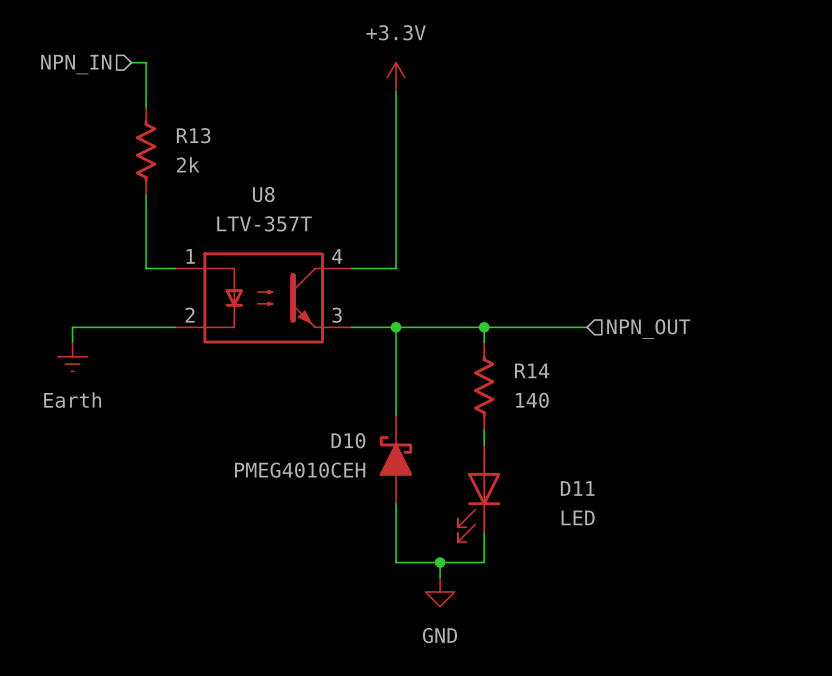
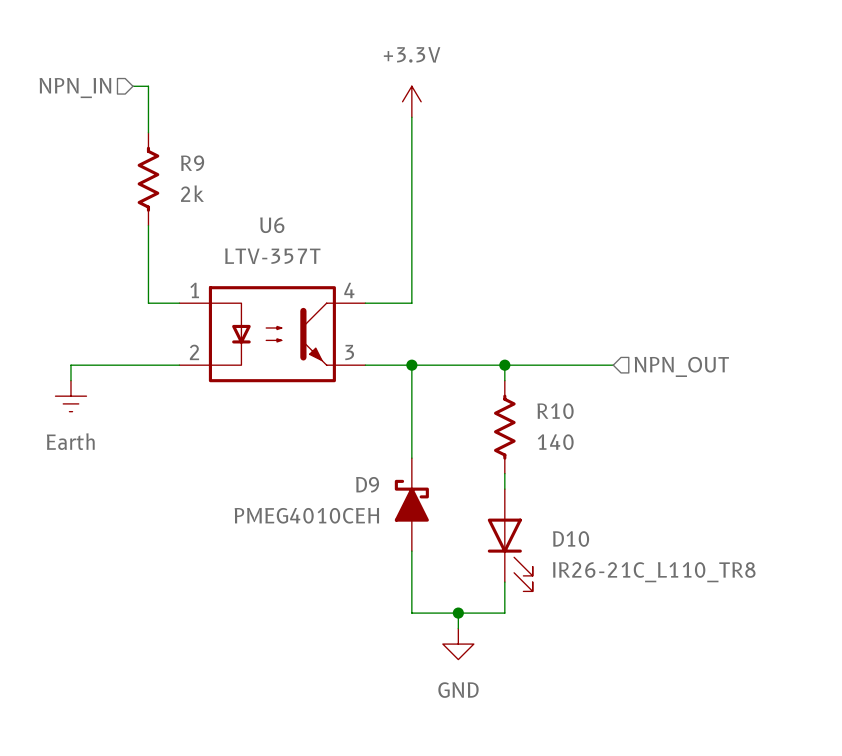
R13 name: R13 (193, 135) -> R9 (192, 163)
U8 name: U8 (263, 194) -> U6 (272, 225)
R14 name: R14 (532, 370) -> R10 (555, 411)
D10 name: D10 (348, 440) -> D9 (367, 484)
D11: LED (479, 493) -> none
D10: none -> IR26-21C_L110_TR8 (510, 540)

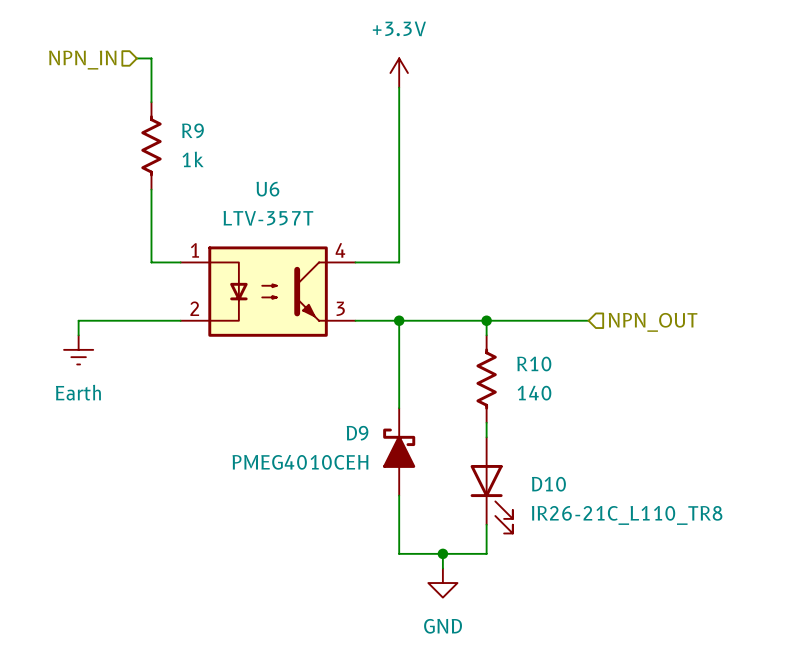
R9 value: 2k (192, 193) -> 1k (193, 159)

